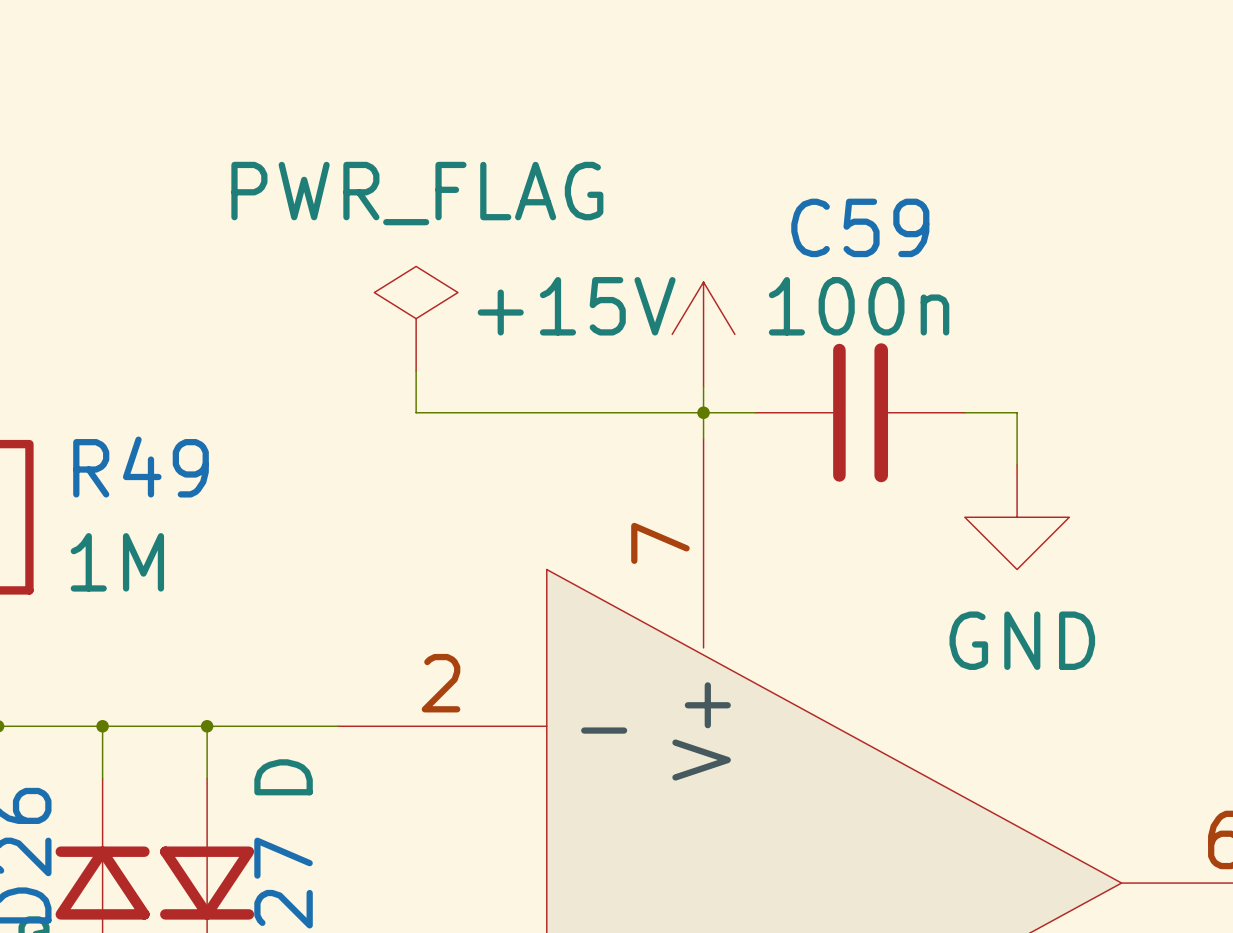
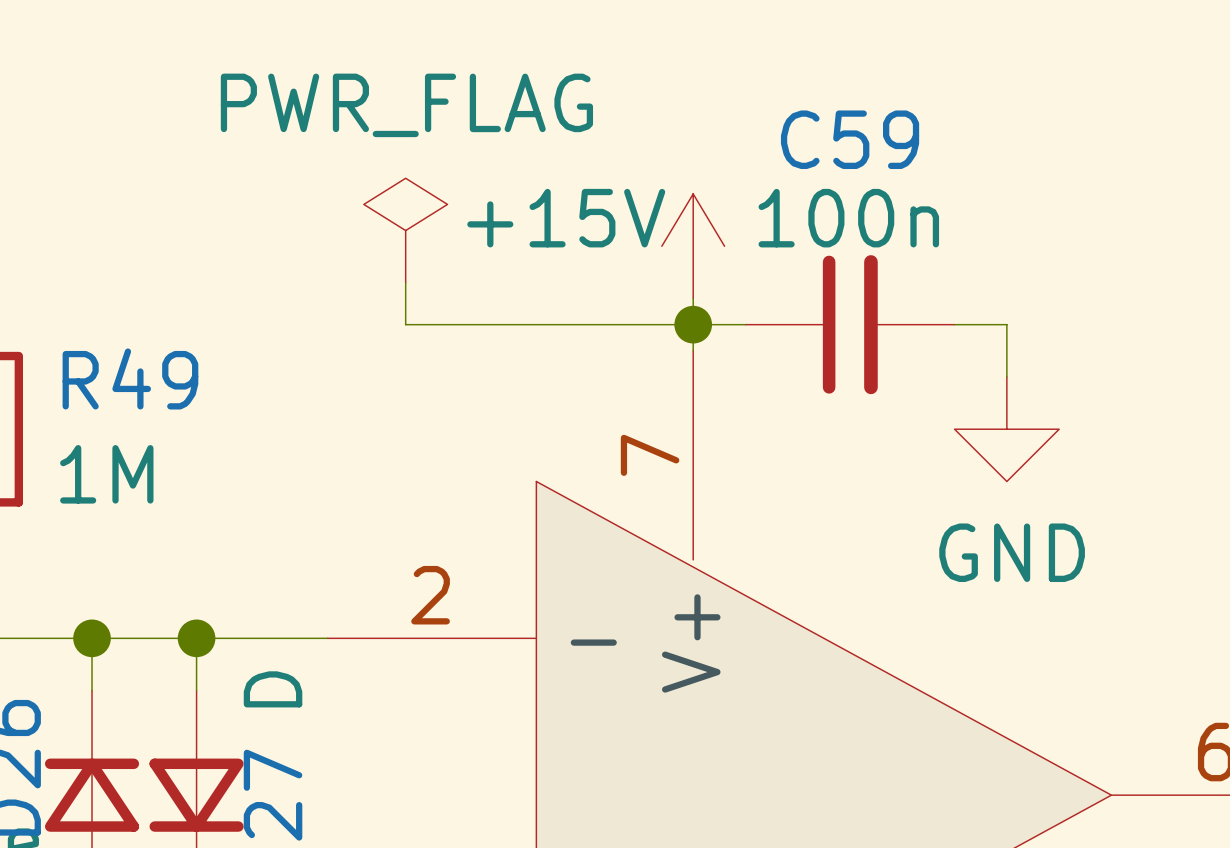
junction size: [697, 406, 710, 420] -> [674, 305, 713, 344]
junction size: [96, 720, 109, 733] -> [73, 619, 111, 658]
junction size: [200, 720, 214, 733] -> [177, 619, 216, 658]

